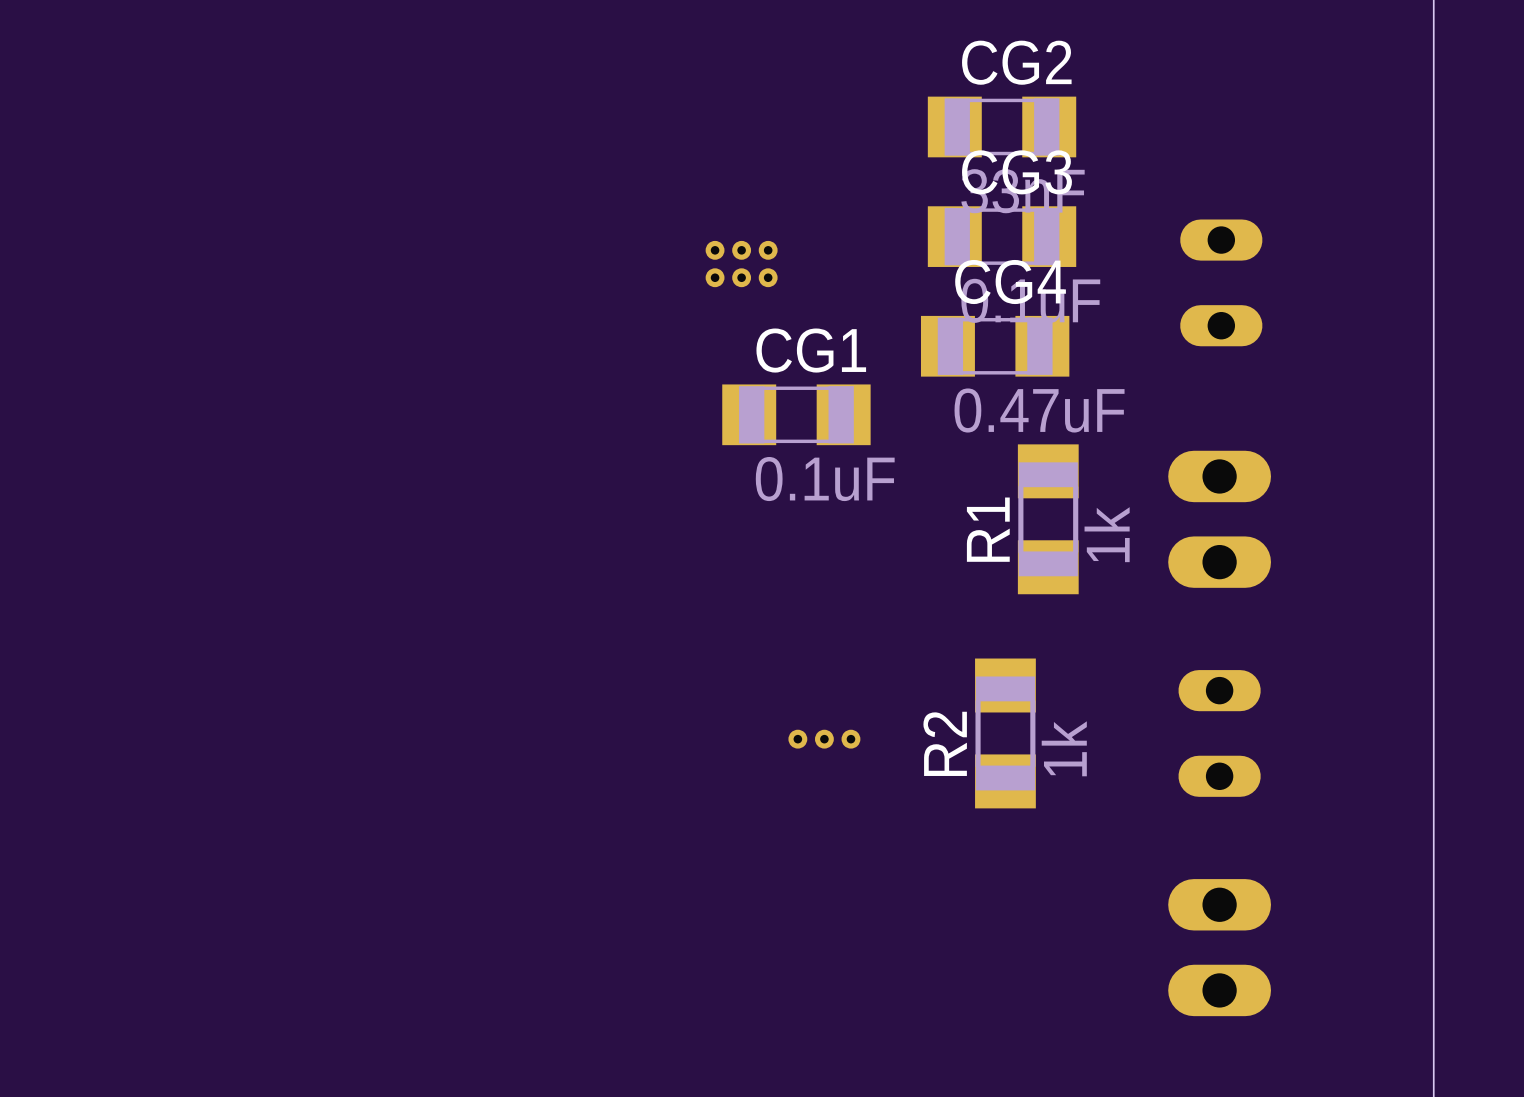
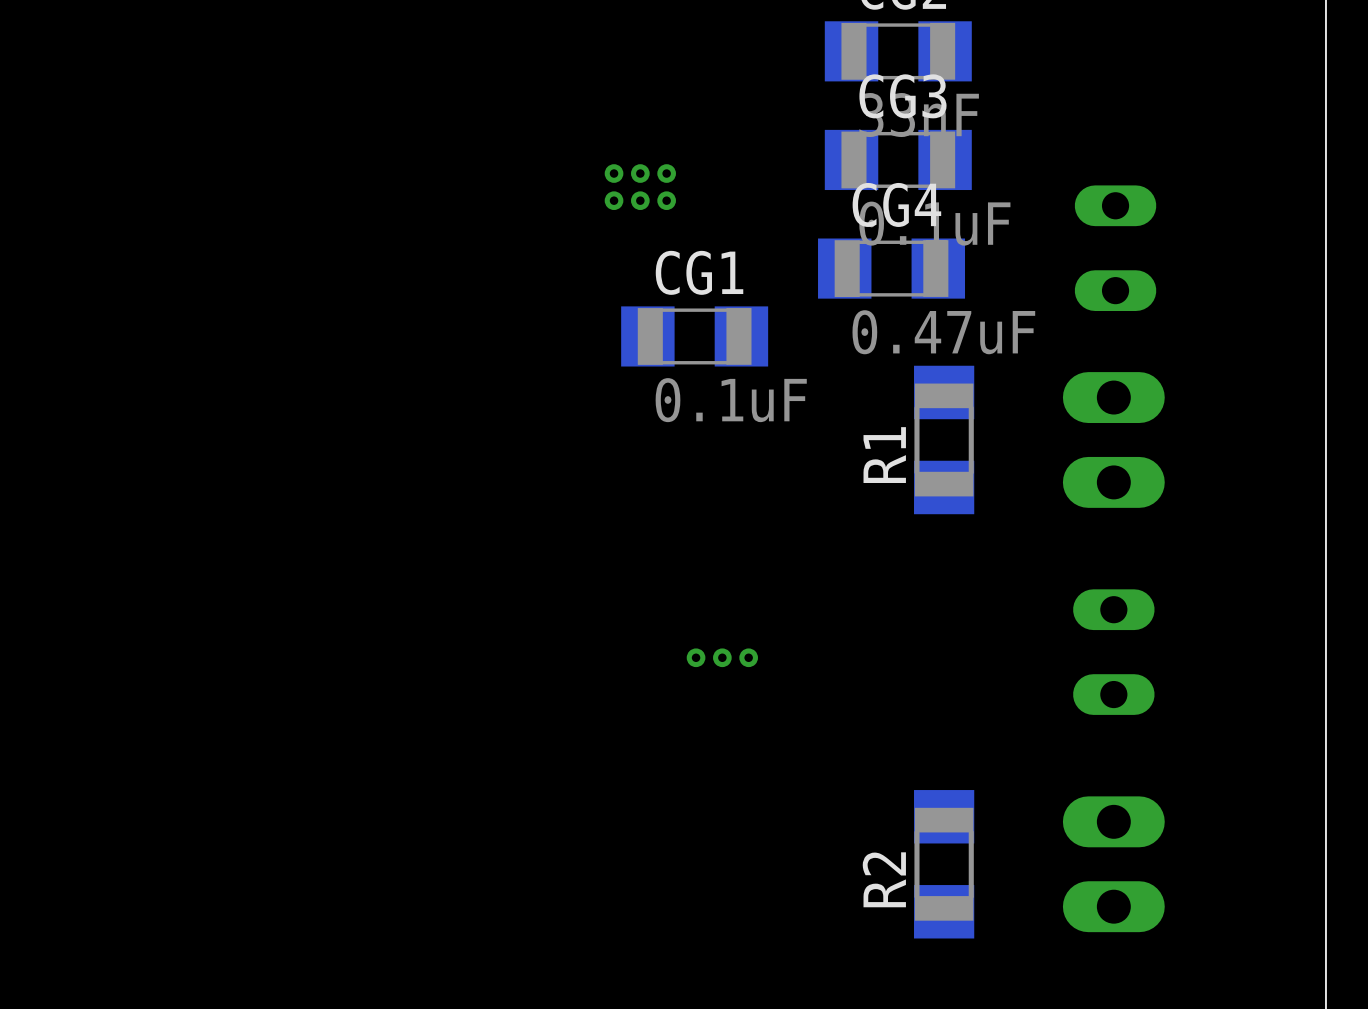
part position: (1221, 282) -> (1115, 248)
R1 value: 1k (1107, 534) -> none
R2 position: (1005, 733) -> (944, 864)
R2 value: 1k (1064, 748) -> none

